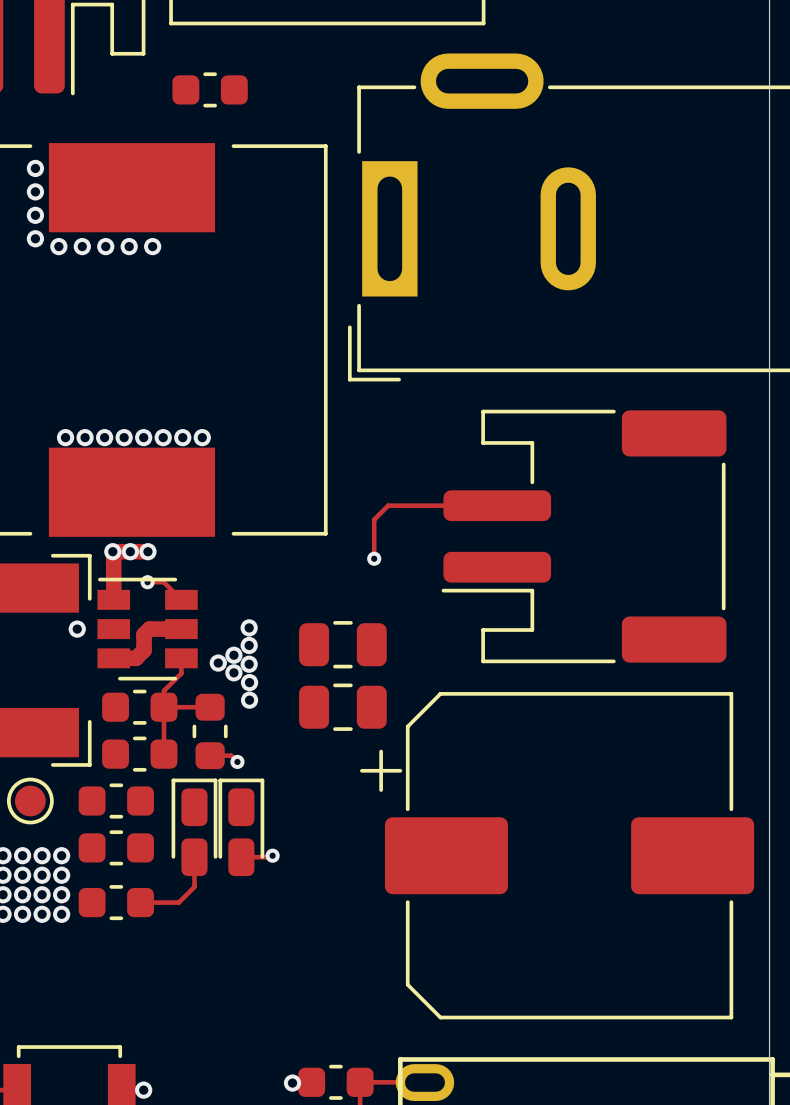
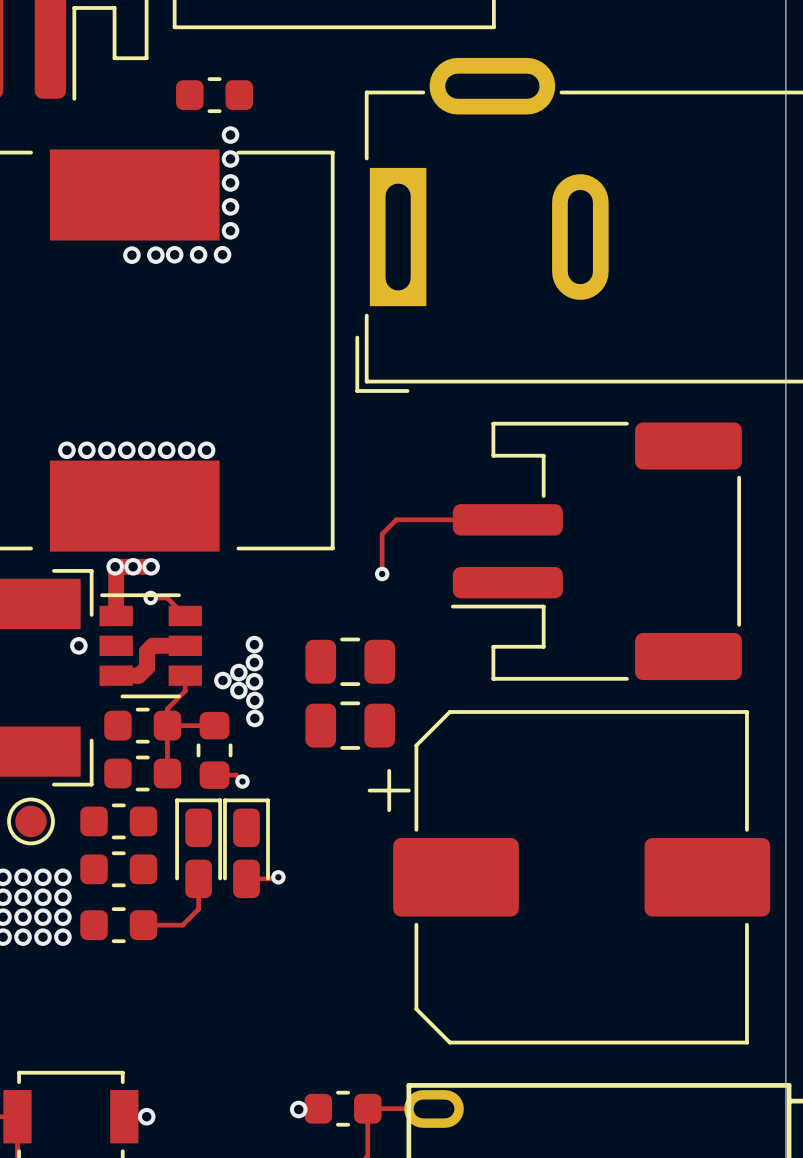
via: none -> (230, 135)
via: none -> (230, 158)
via: (35, 168) -> none
via: none -> (230, 182)
via: (35, 191) -> none
via: none -> (230, 206)
via: (35, 215) -> none
via: none -> (230, 230)
via: (35, 238) -> none
via: (58, 246) -> none
via: (82, 246) -> none
via: (105, 246) -> none
via: none -> (174, 254)
via: none -> (198, 254)
via: none -> (222, 254)

